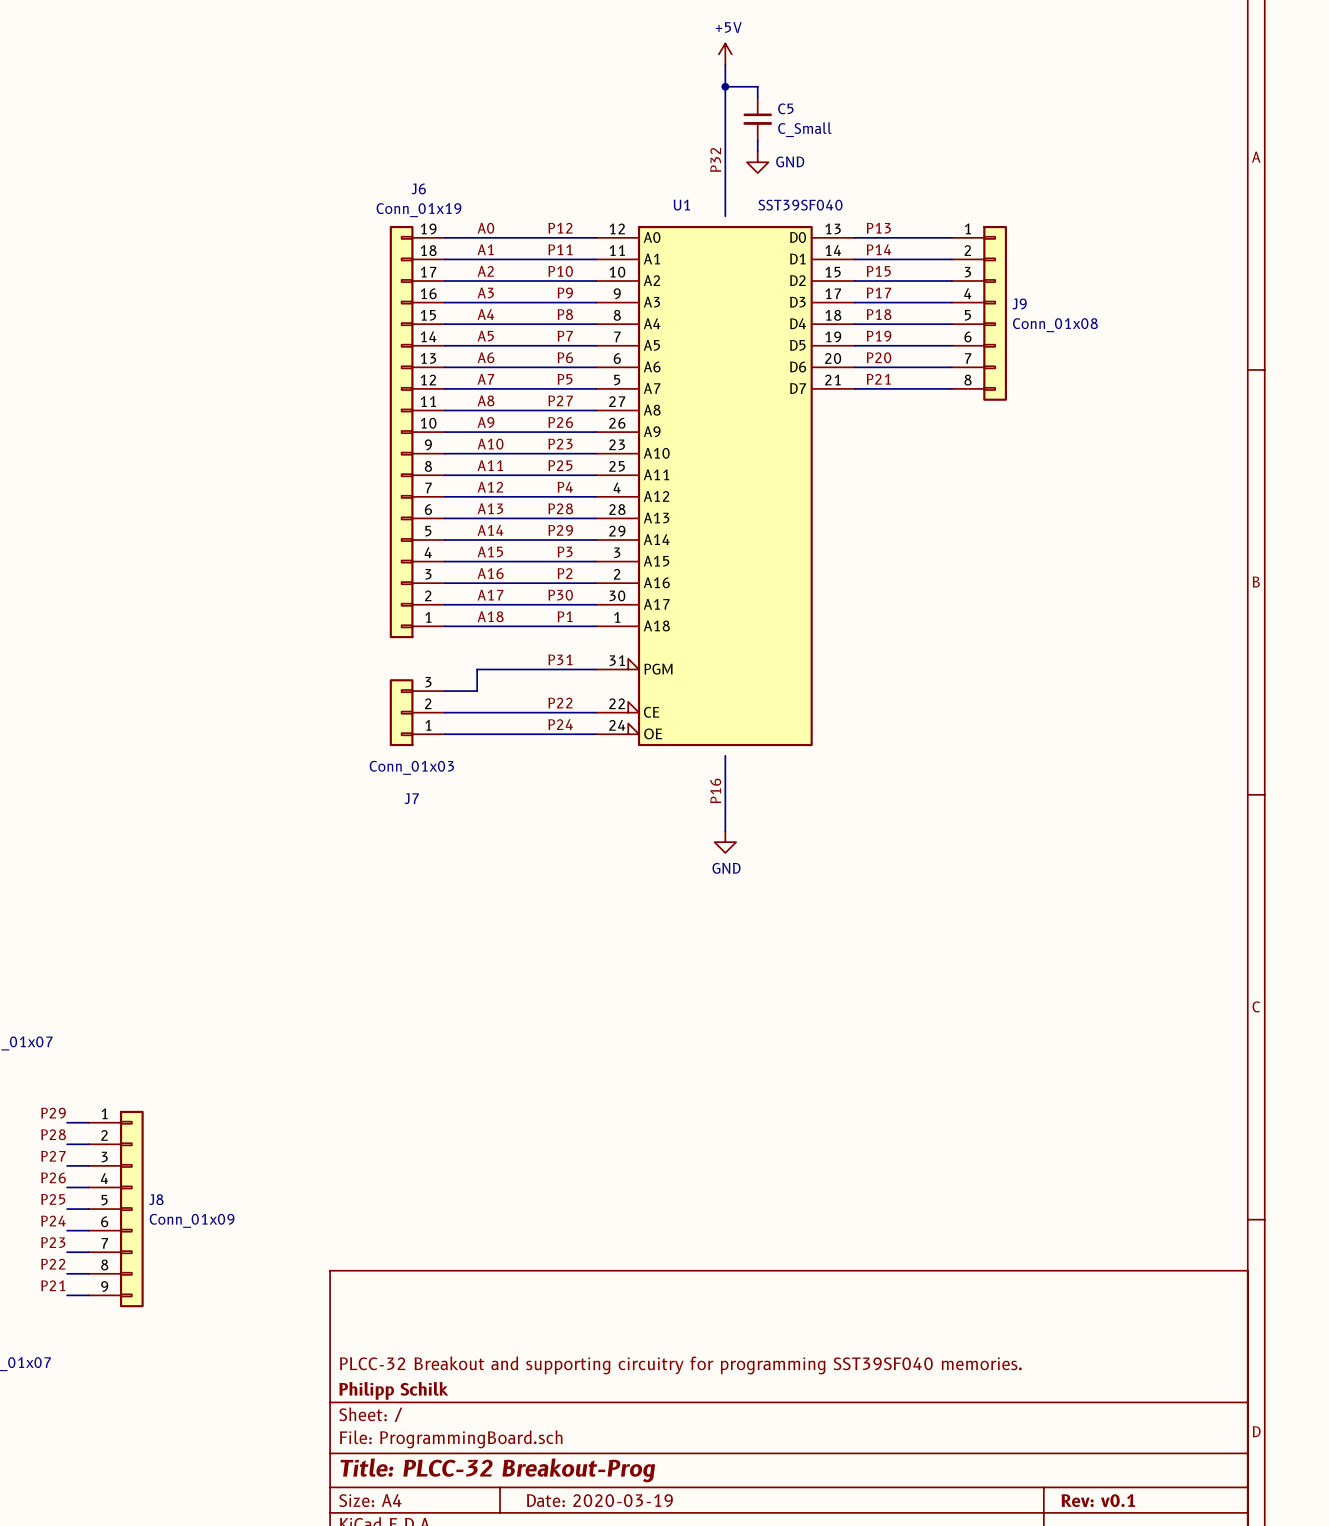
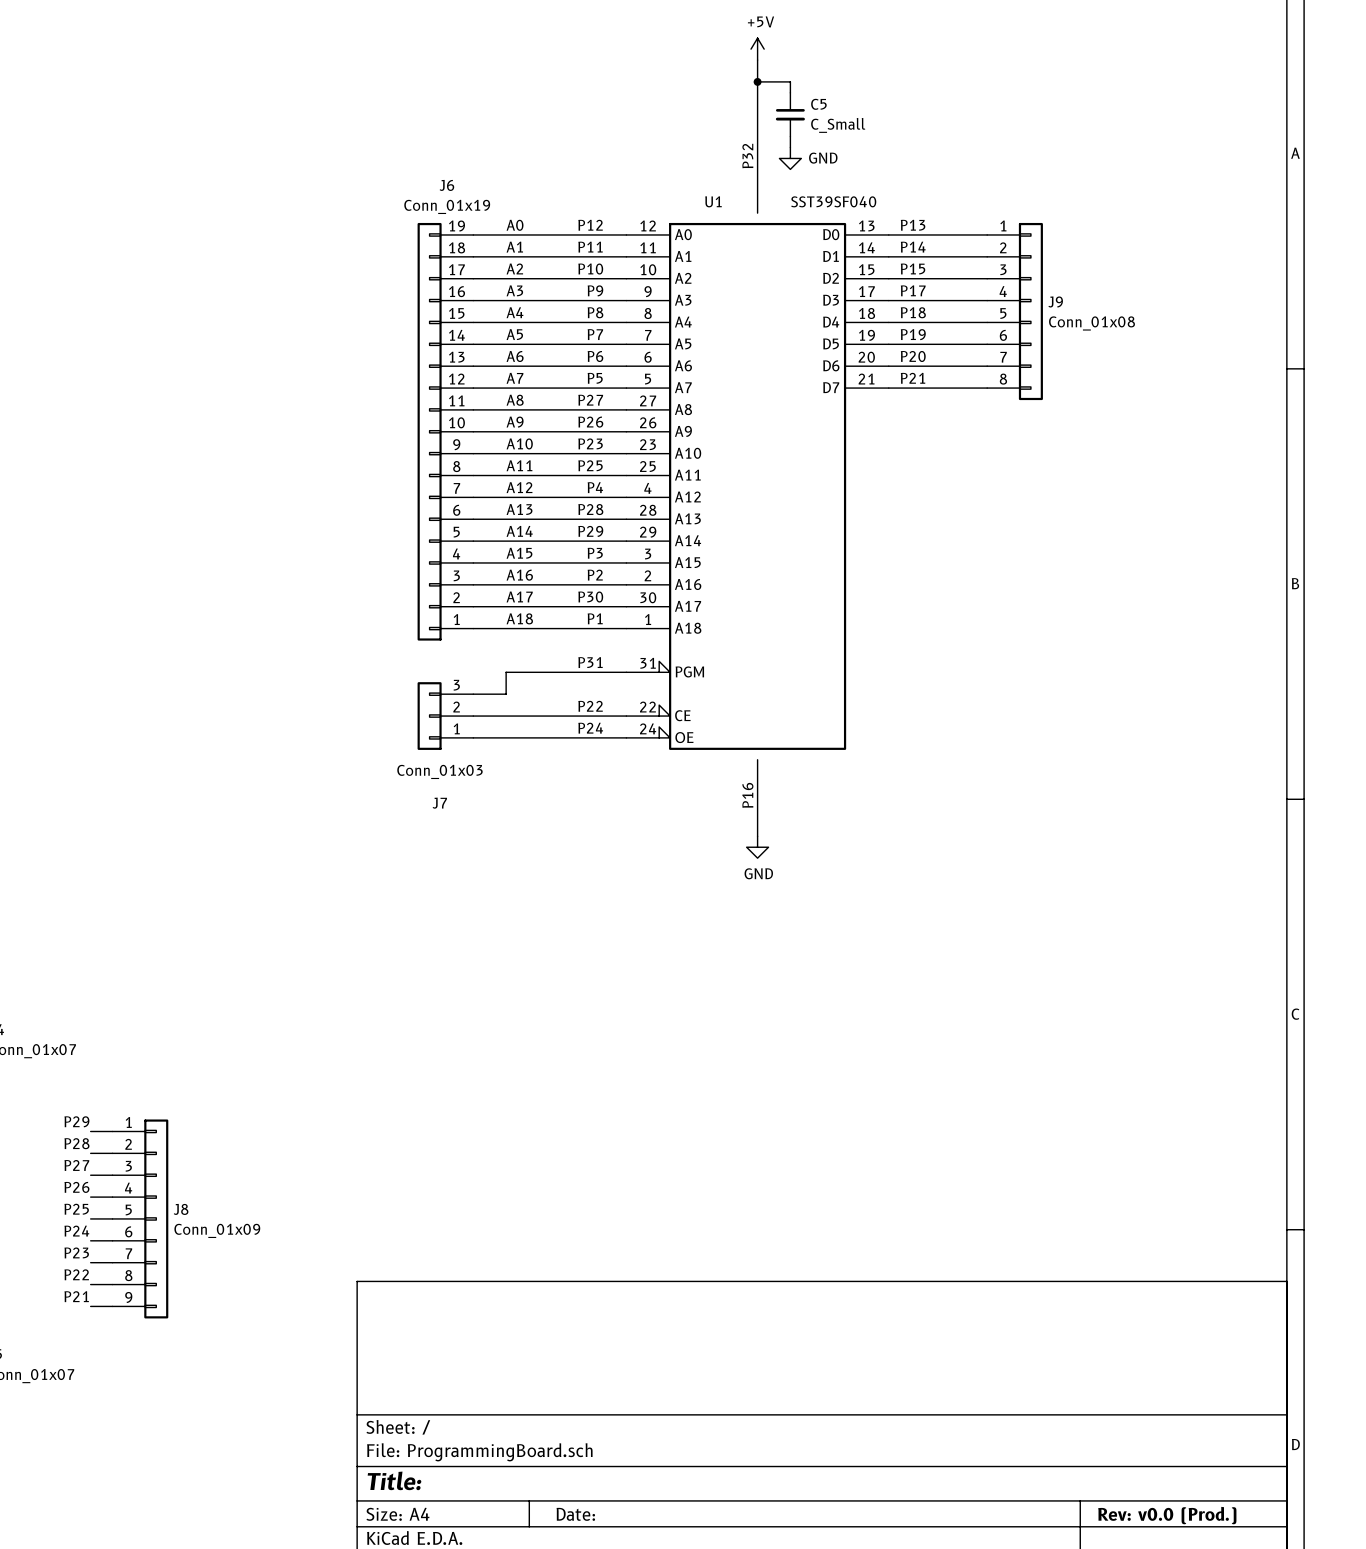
title block: PLCC-32 Breakout and supporting circuitry for programming SST39SF040 memories. (680, 1365) -> none
title block: Philipp Schilk (393, 1390) -> none
title block: Title: PLCC-32 Breakout-Prog (497, 1470) -> Title: (394, 1480)
title block: Date: 2020-03-19 (599, 1500) -> Date: (575, 1514)
title block: Rev: v0.1 (1098, 1500) -> Rev: v0.0 (Prod.) (1167, 1515)

